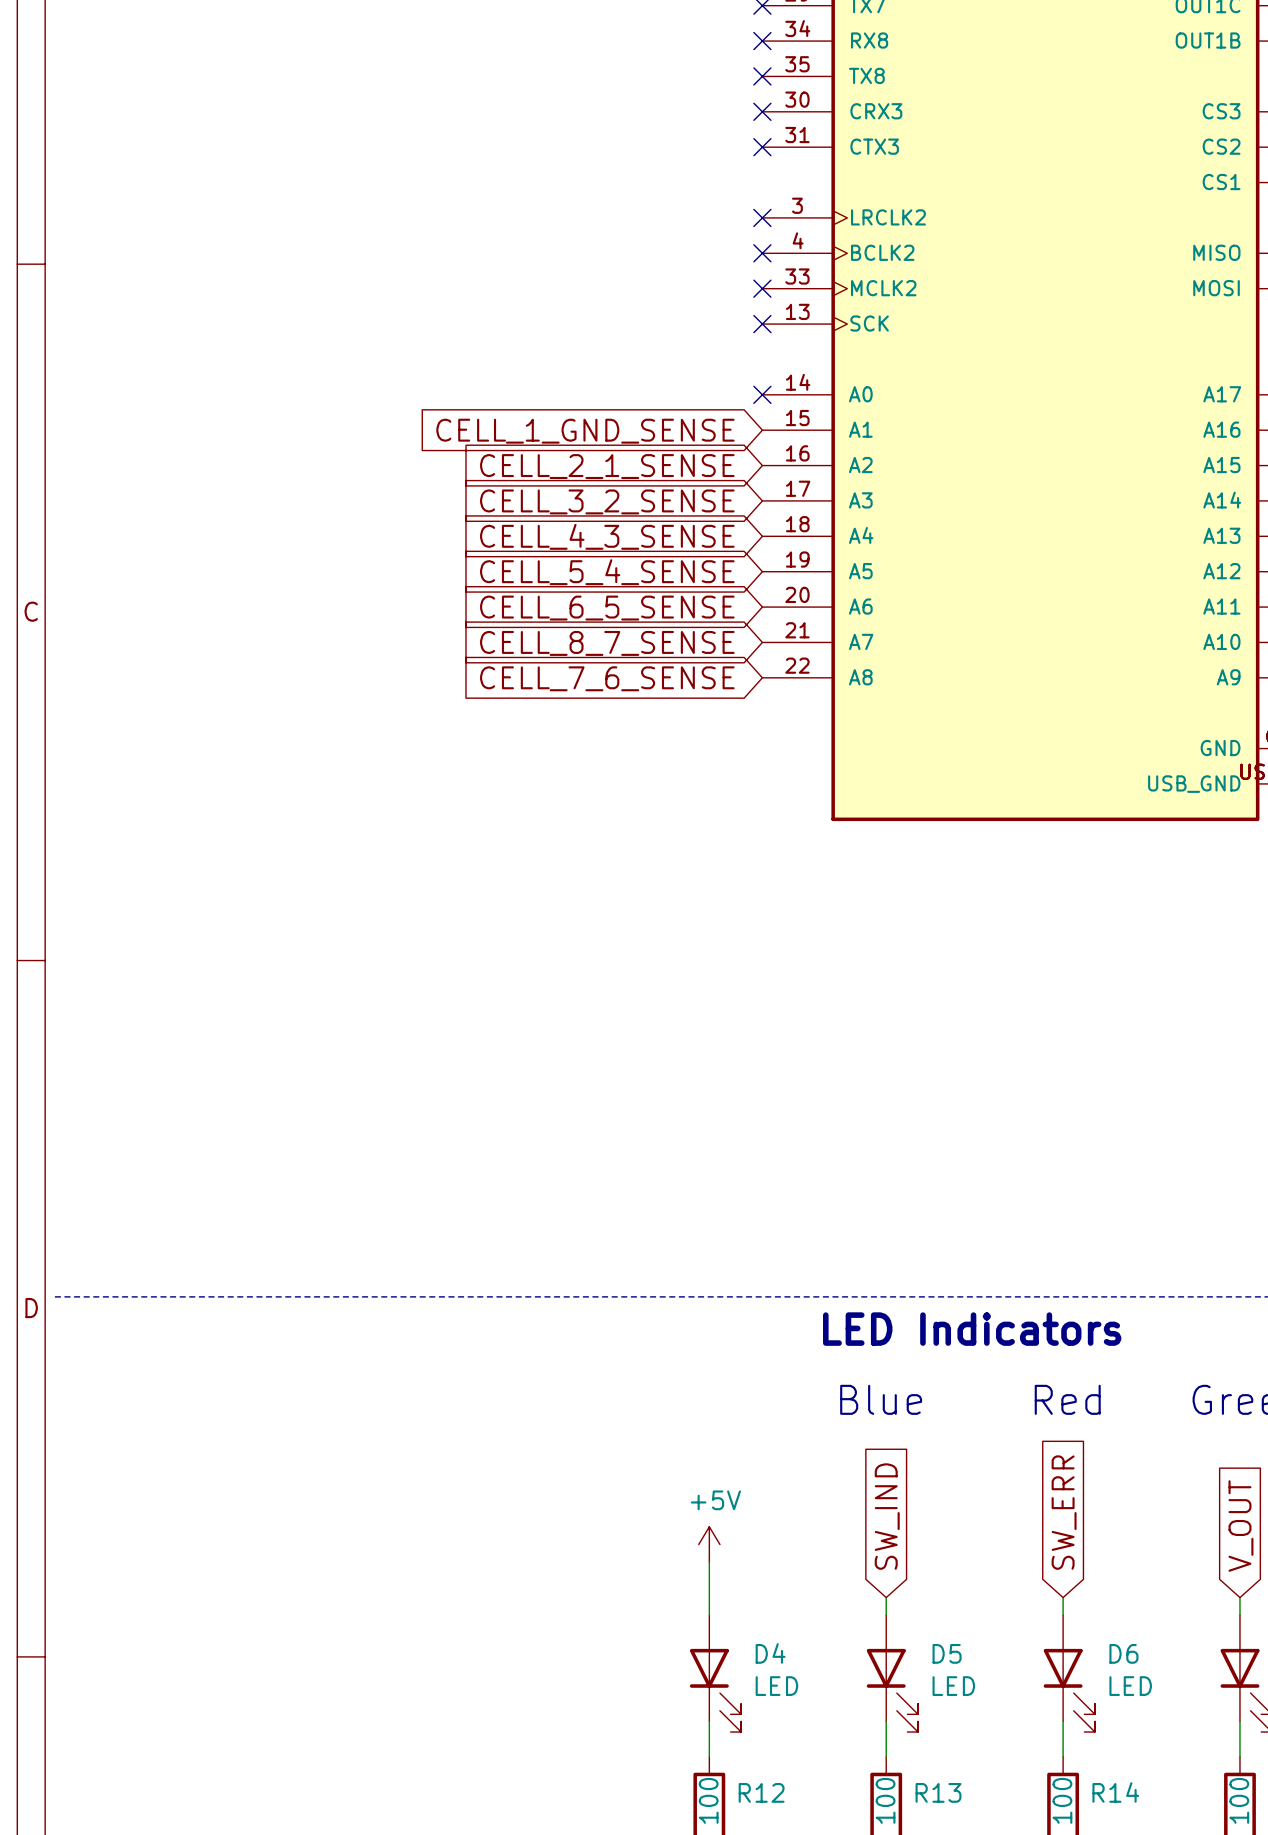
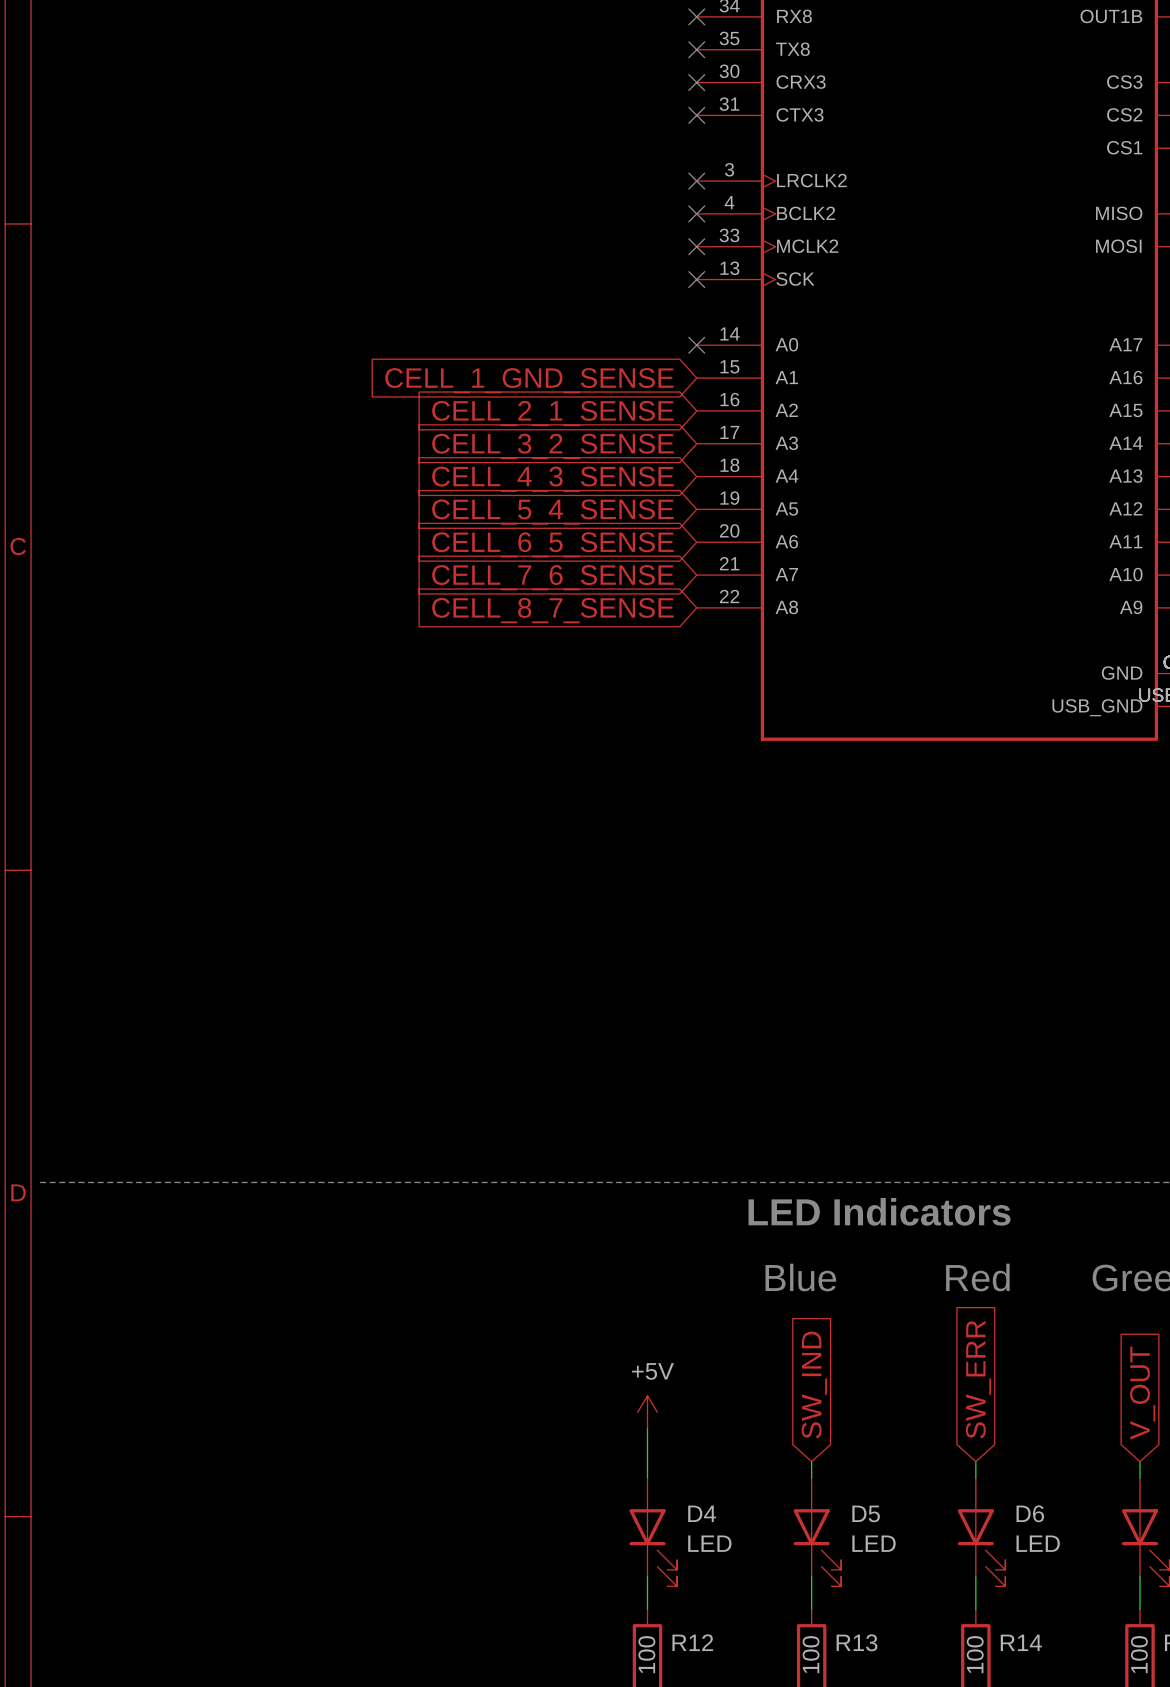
global label: CELL_8_7_SENSE (607, 643) -> CELL_7_6_SENSE (552, 577)
global label: CELL_7_6_SENSE (607, 678) -> CELL_8_7_SENSE (552, 610)

